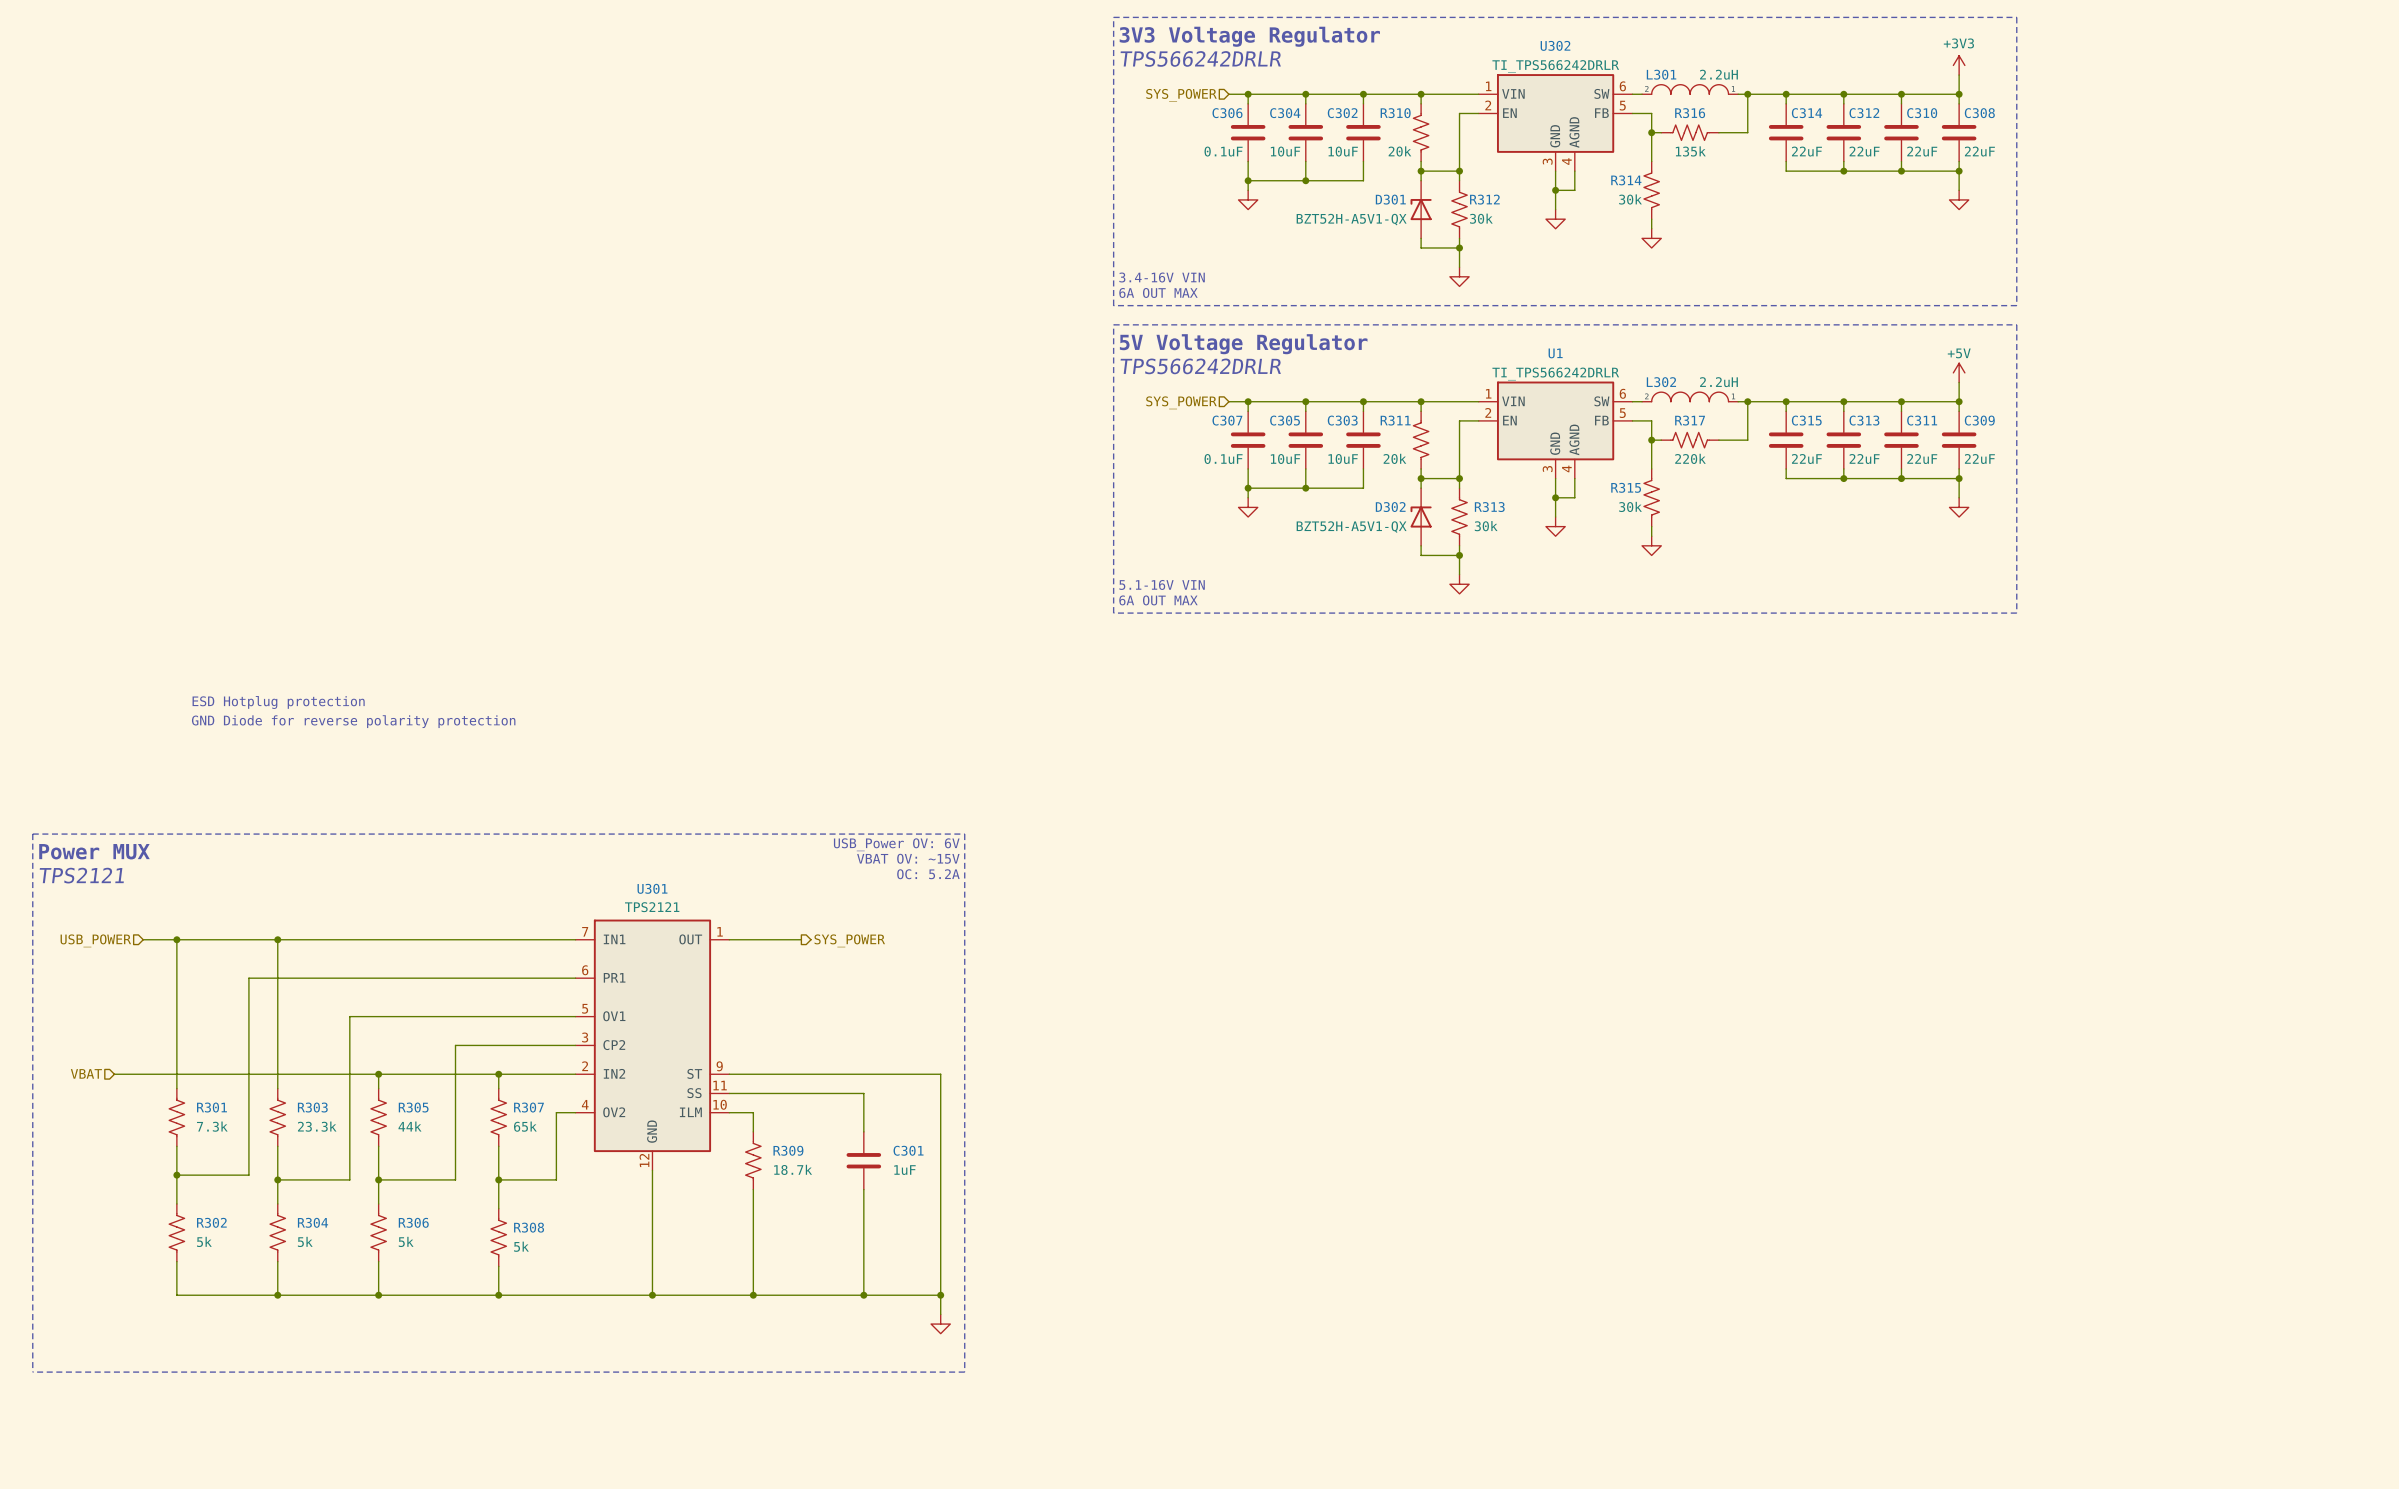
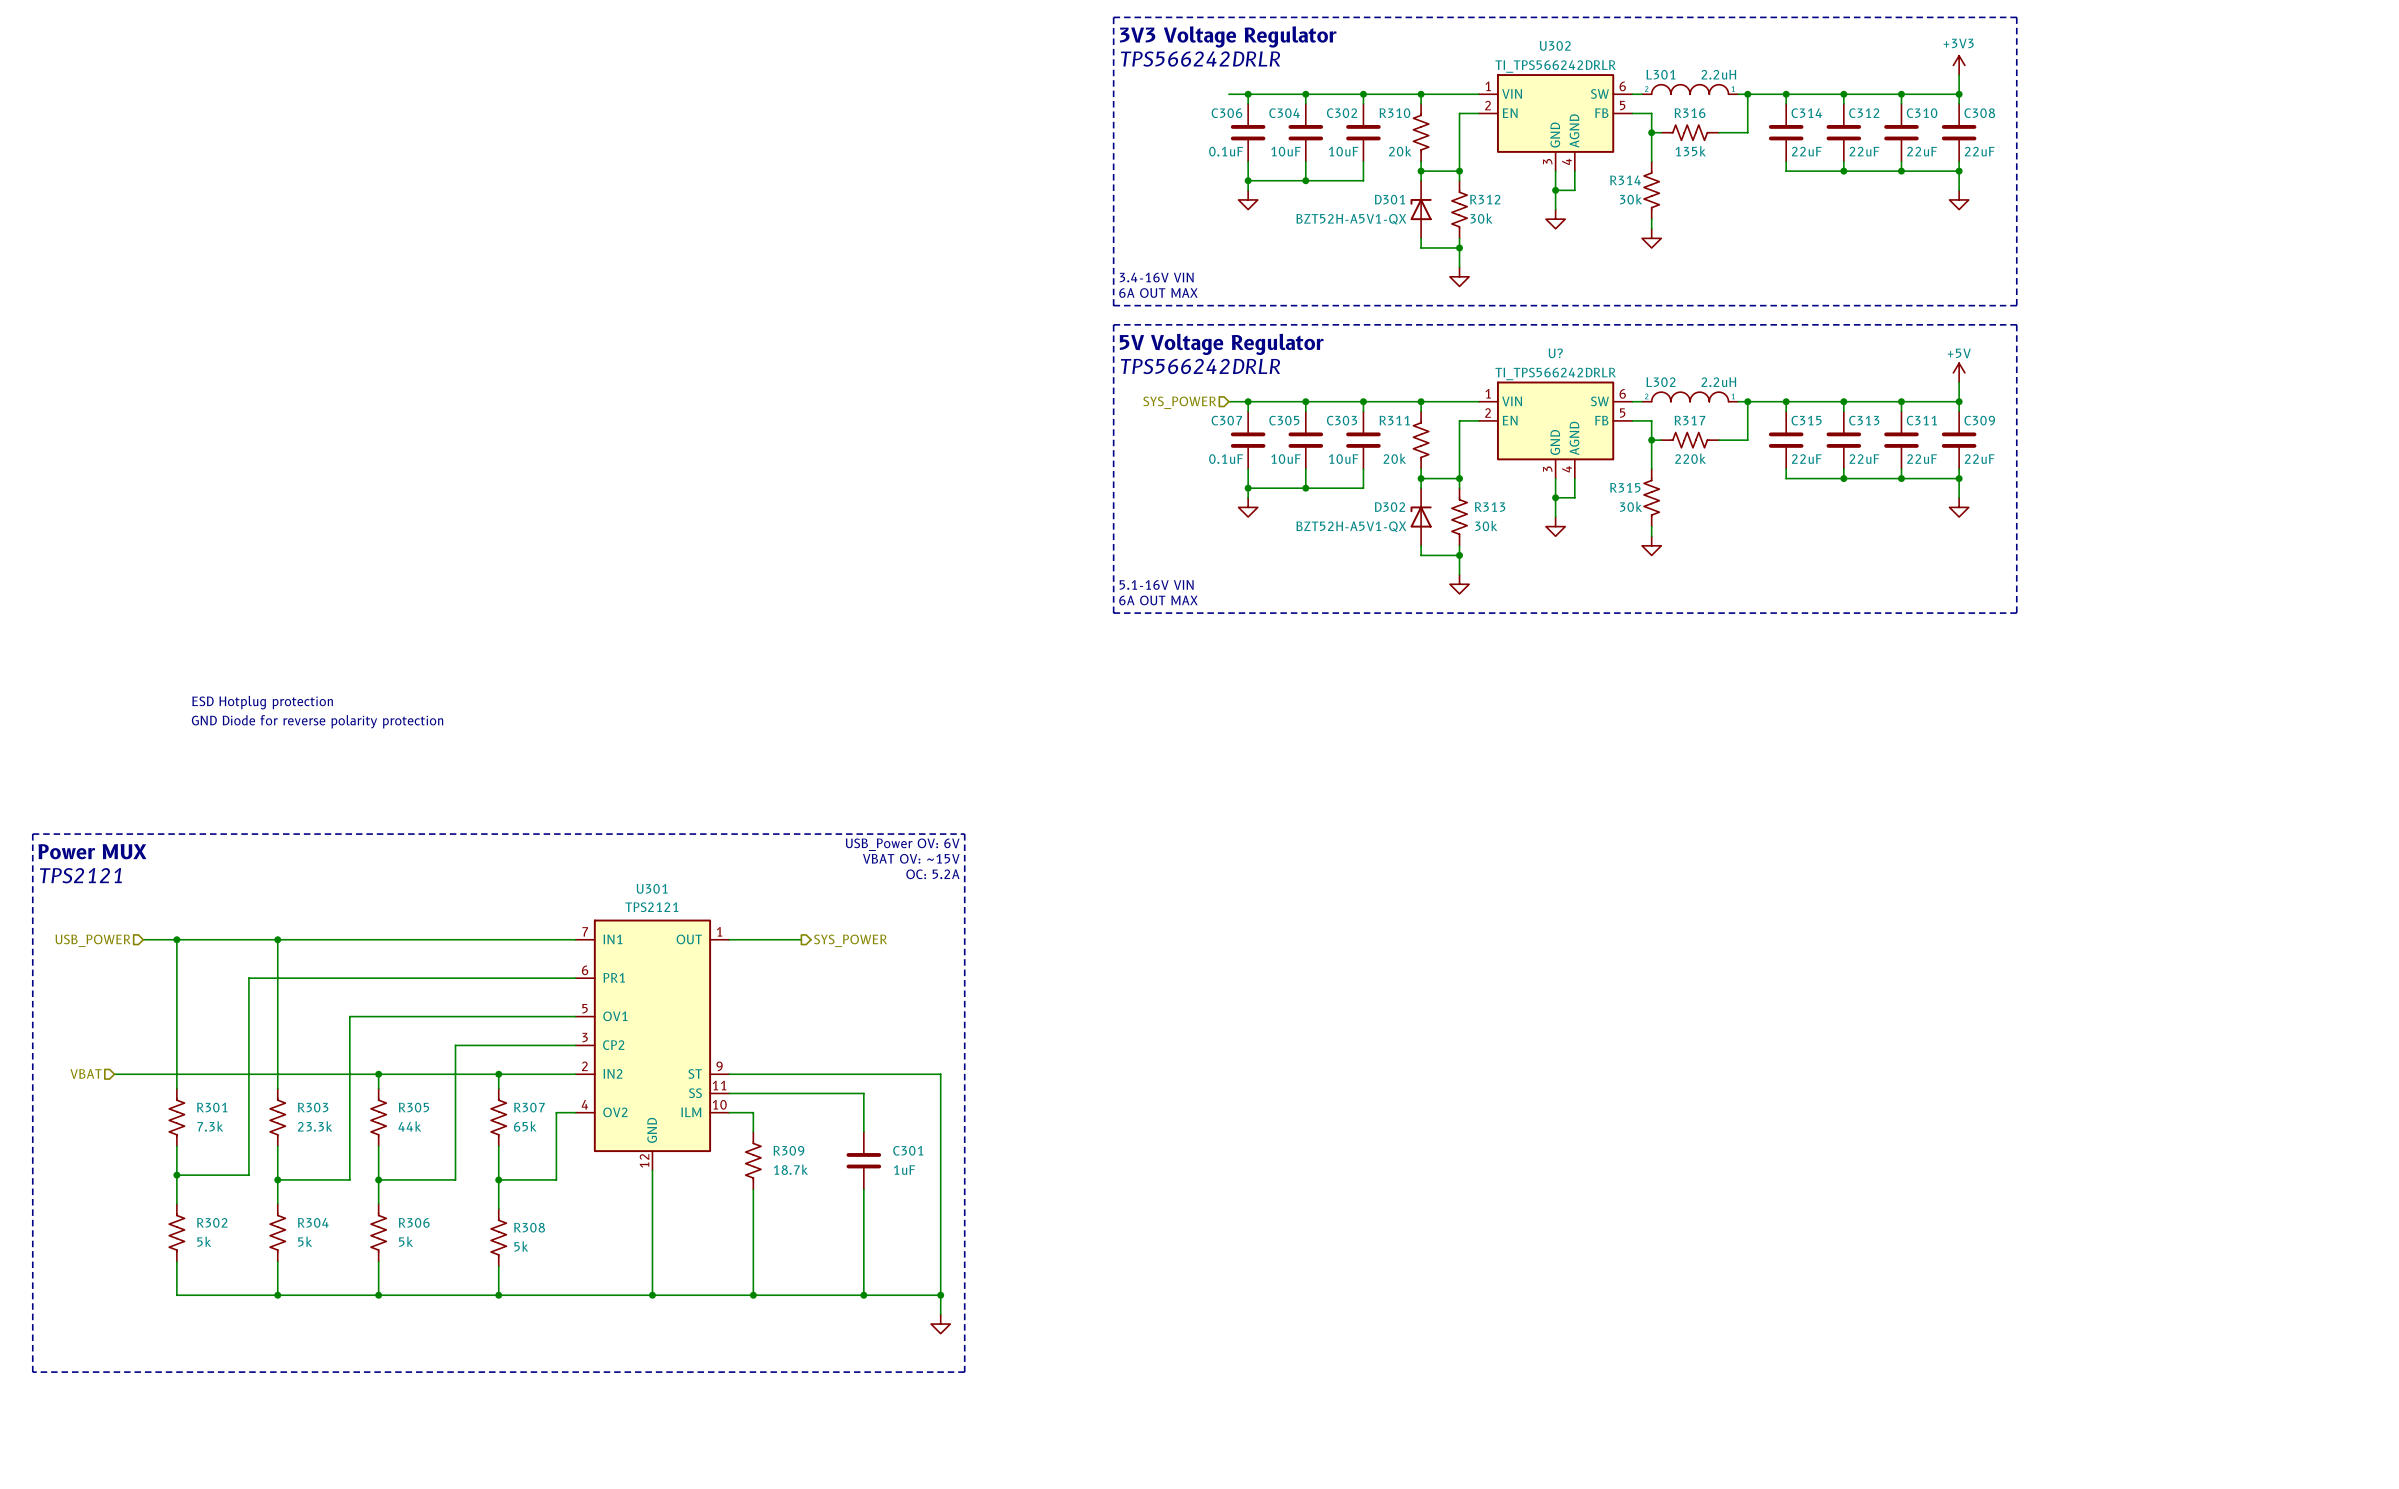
hierarchical label: SYS_POWER (1181, 95) -> none
U1 name: U1 (1555, 353) -> U? (1555, 353)

